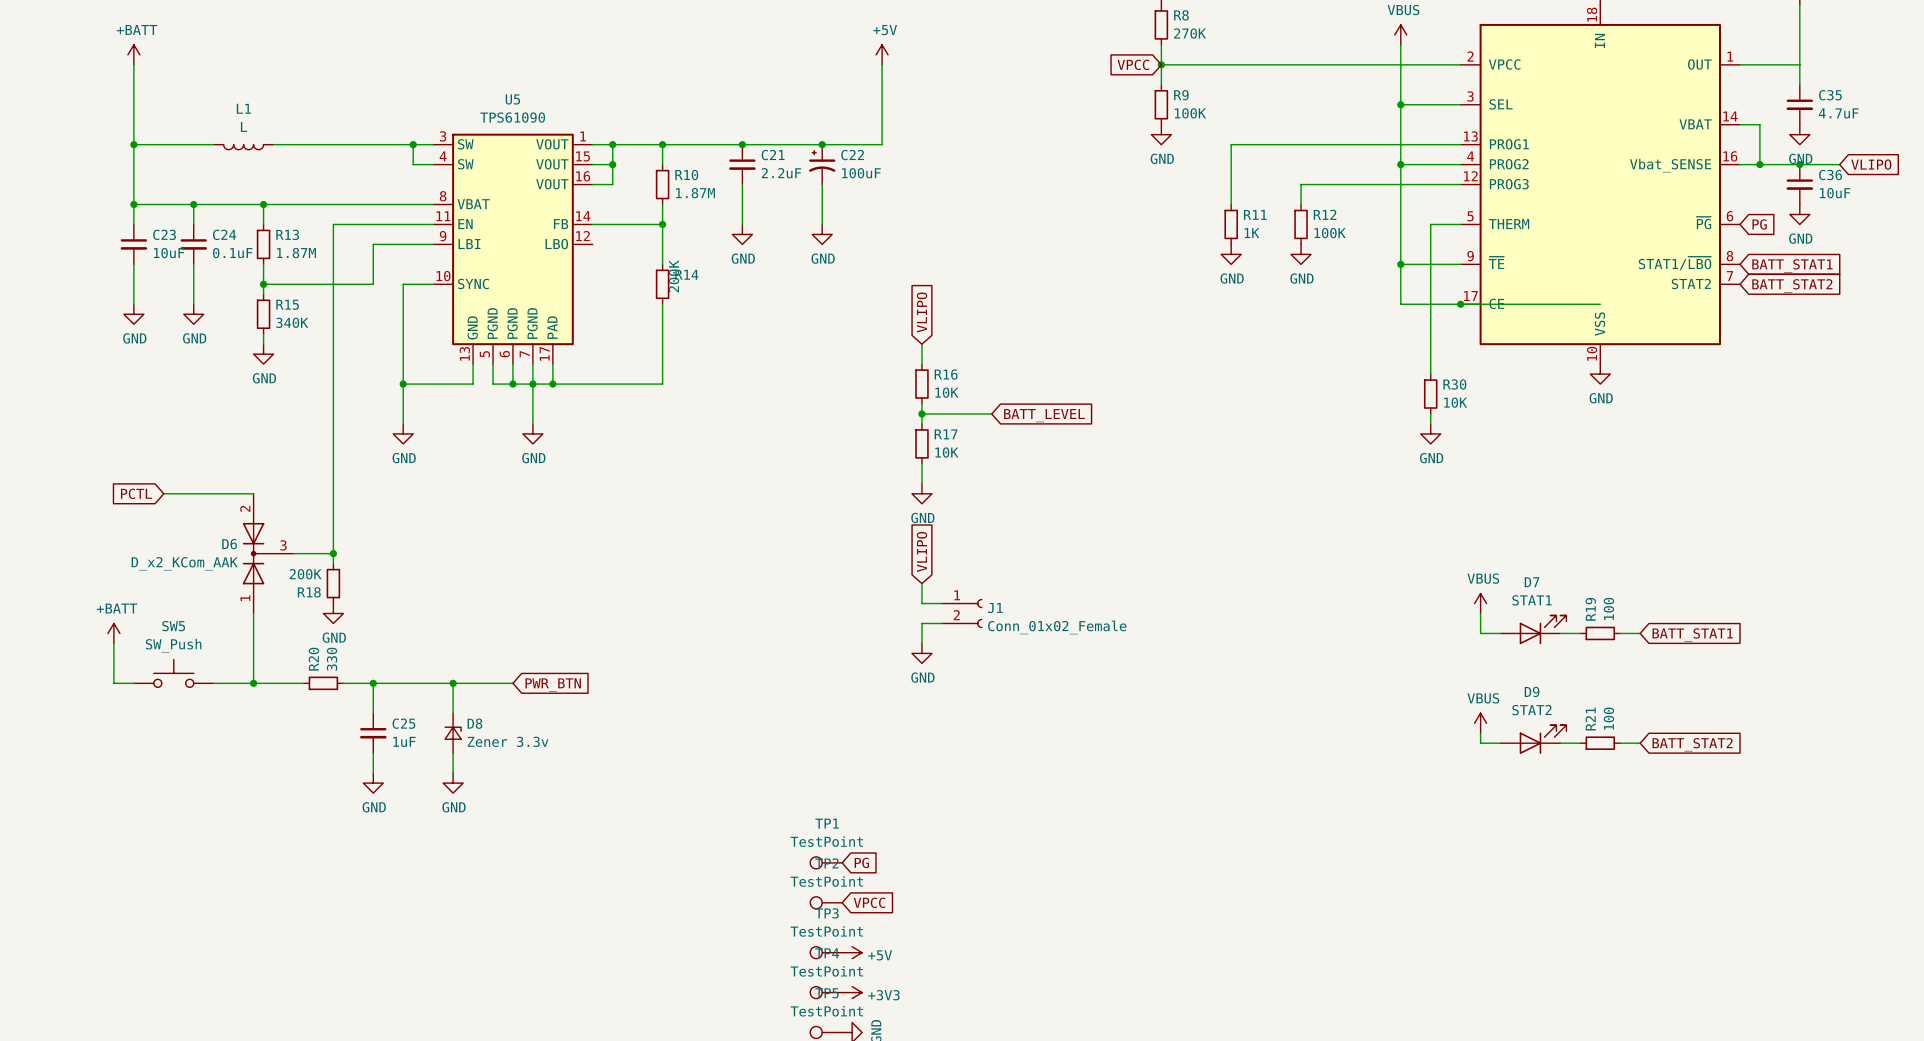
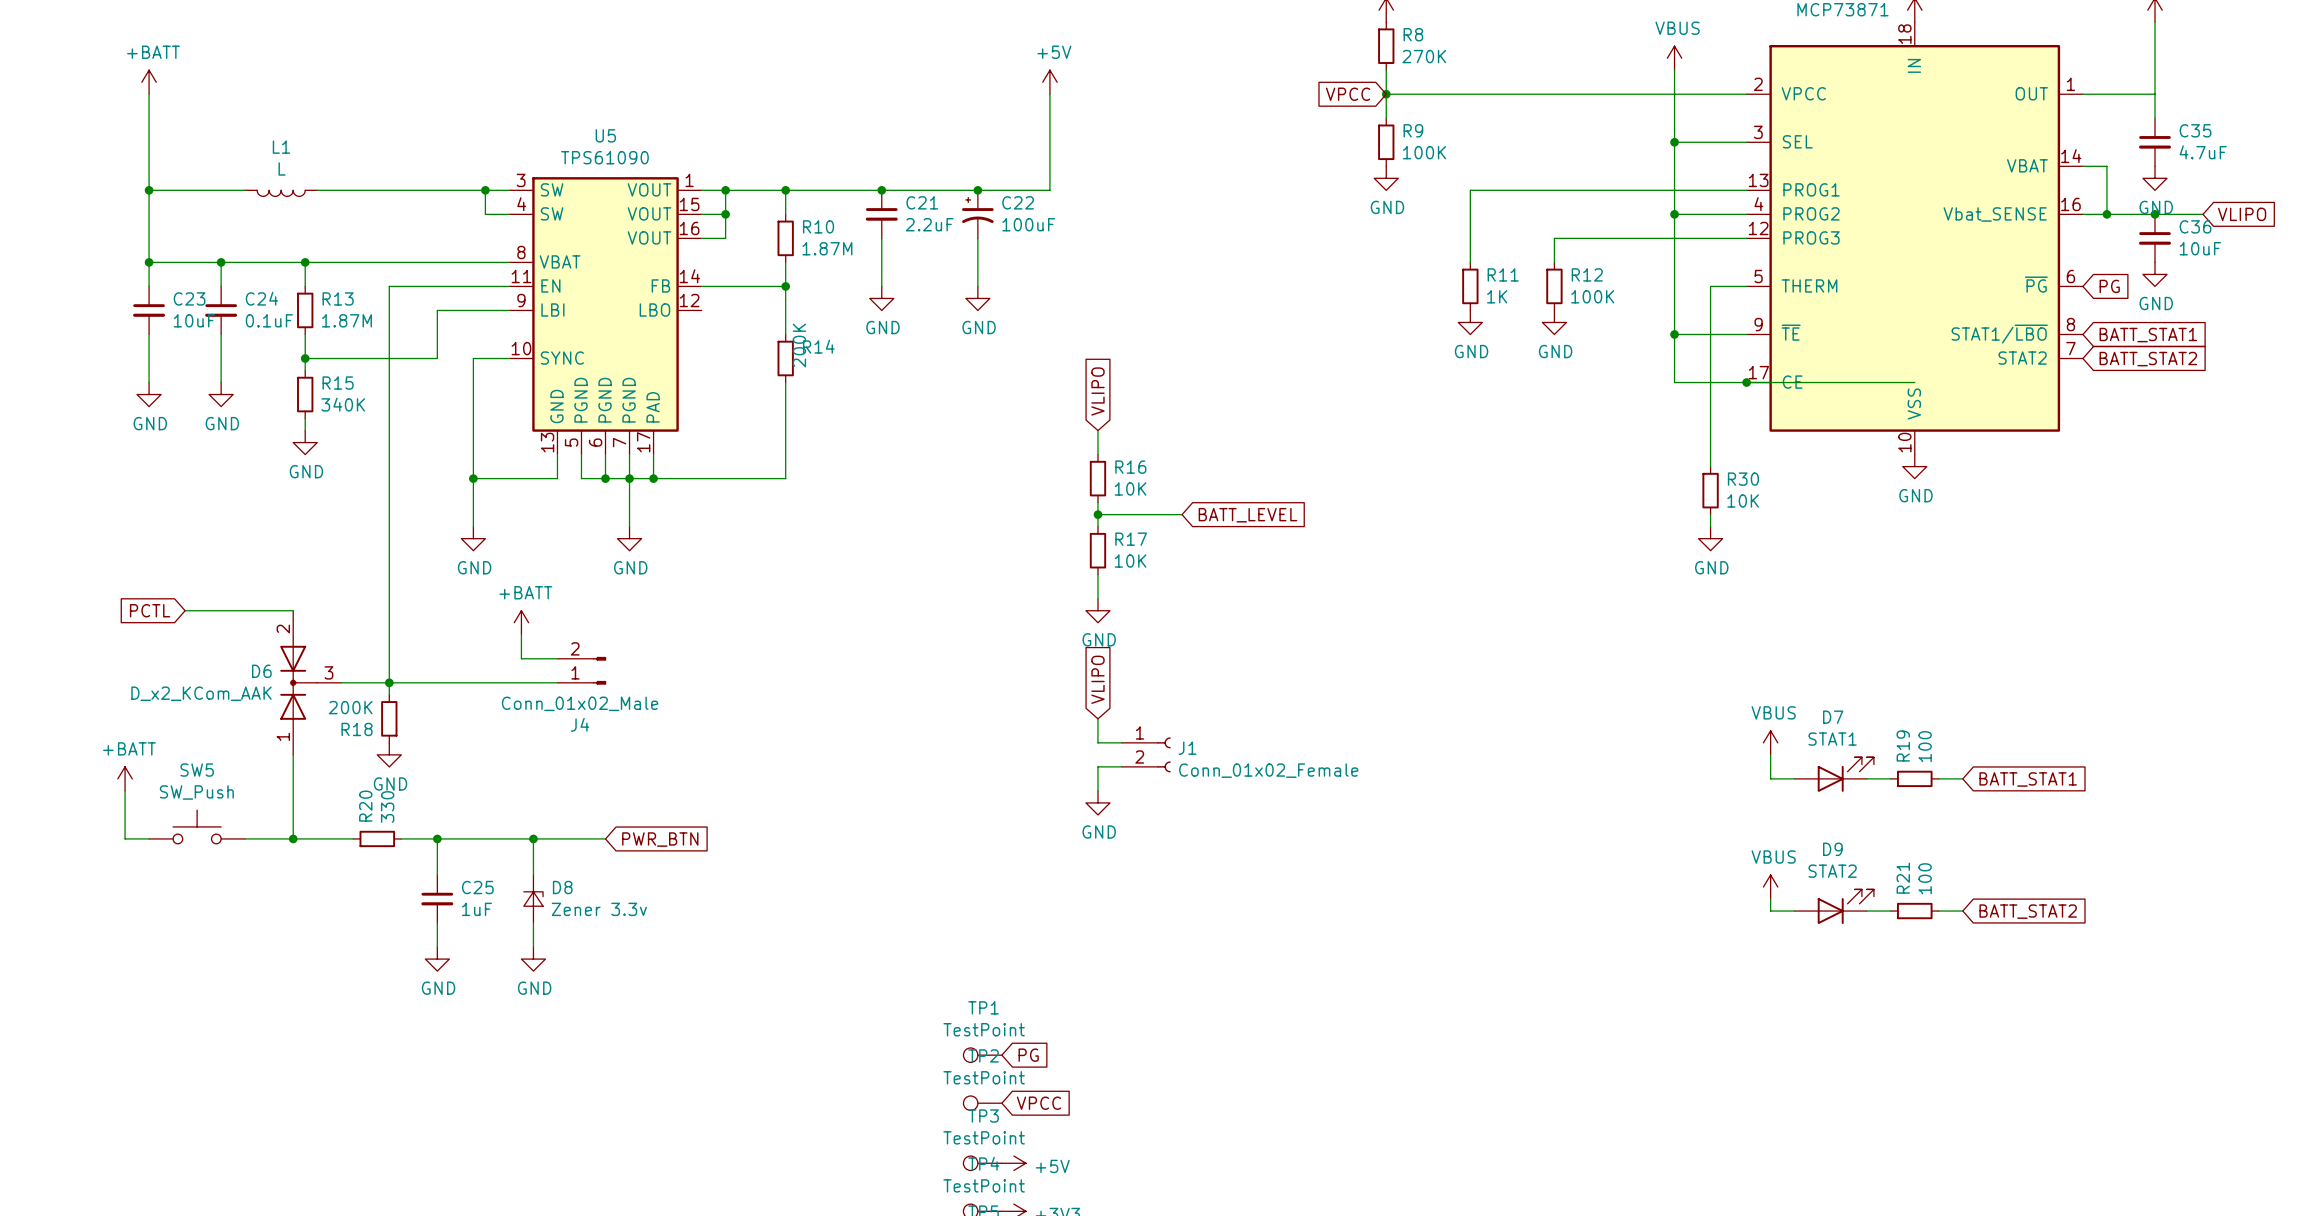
power symbol: none -> +BATT (521, 622)
wire: none -> (521, 634) (521, 658) (557, 658)
J4: none -> Conn_01x02_Male (581, 670)
wire: none -> (389, 682) (557, 682)

